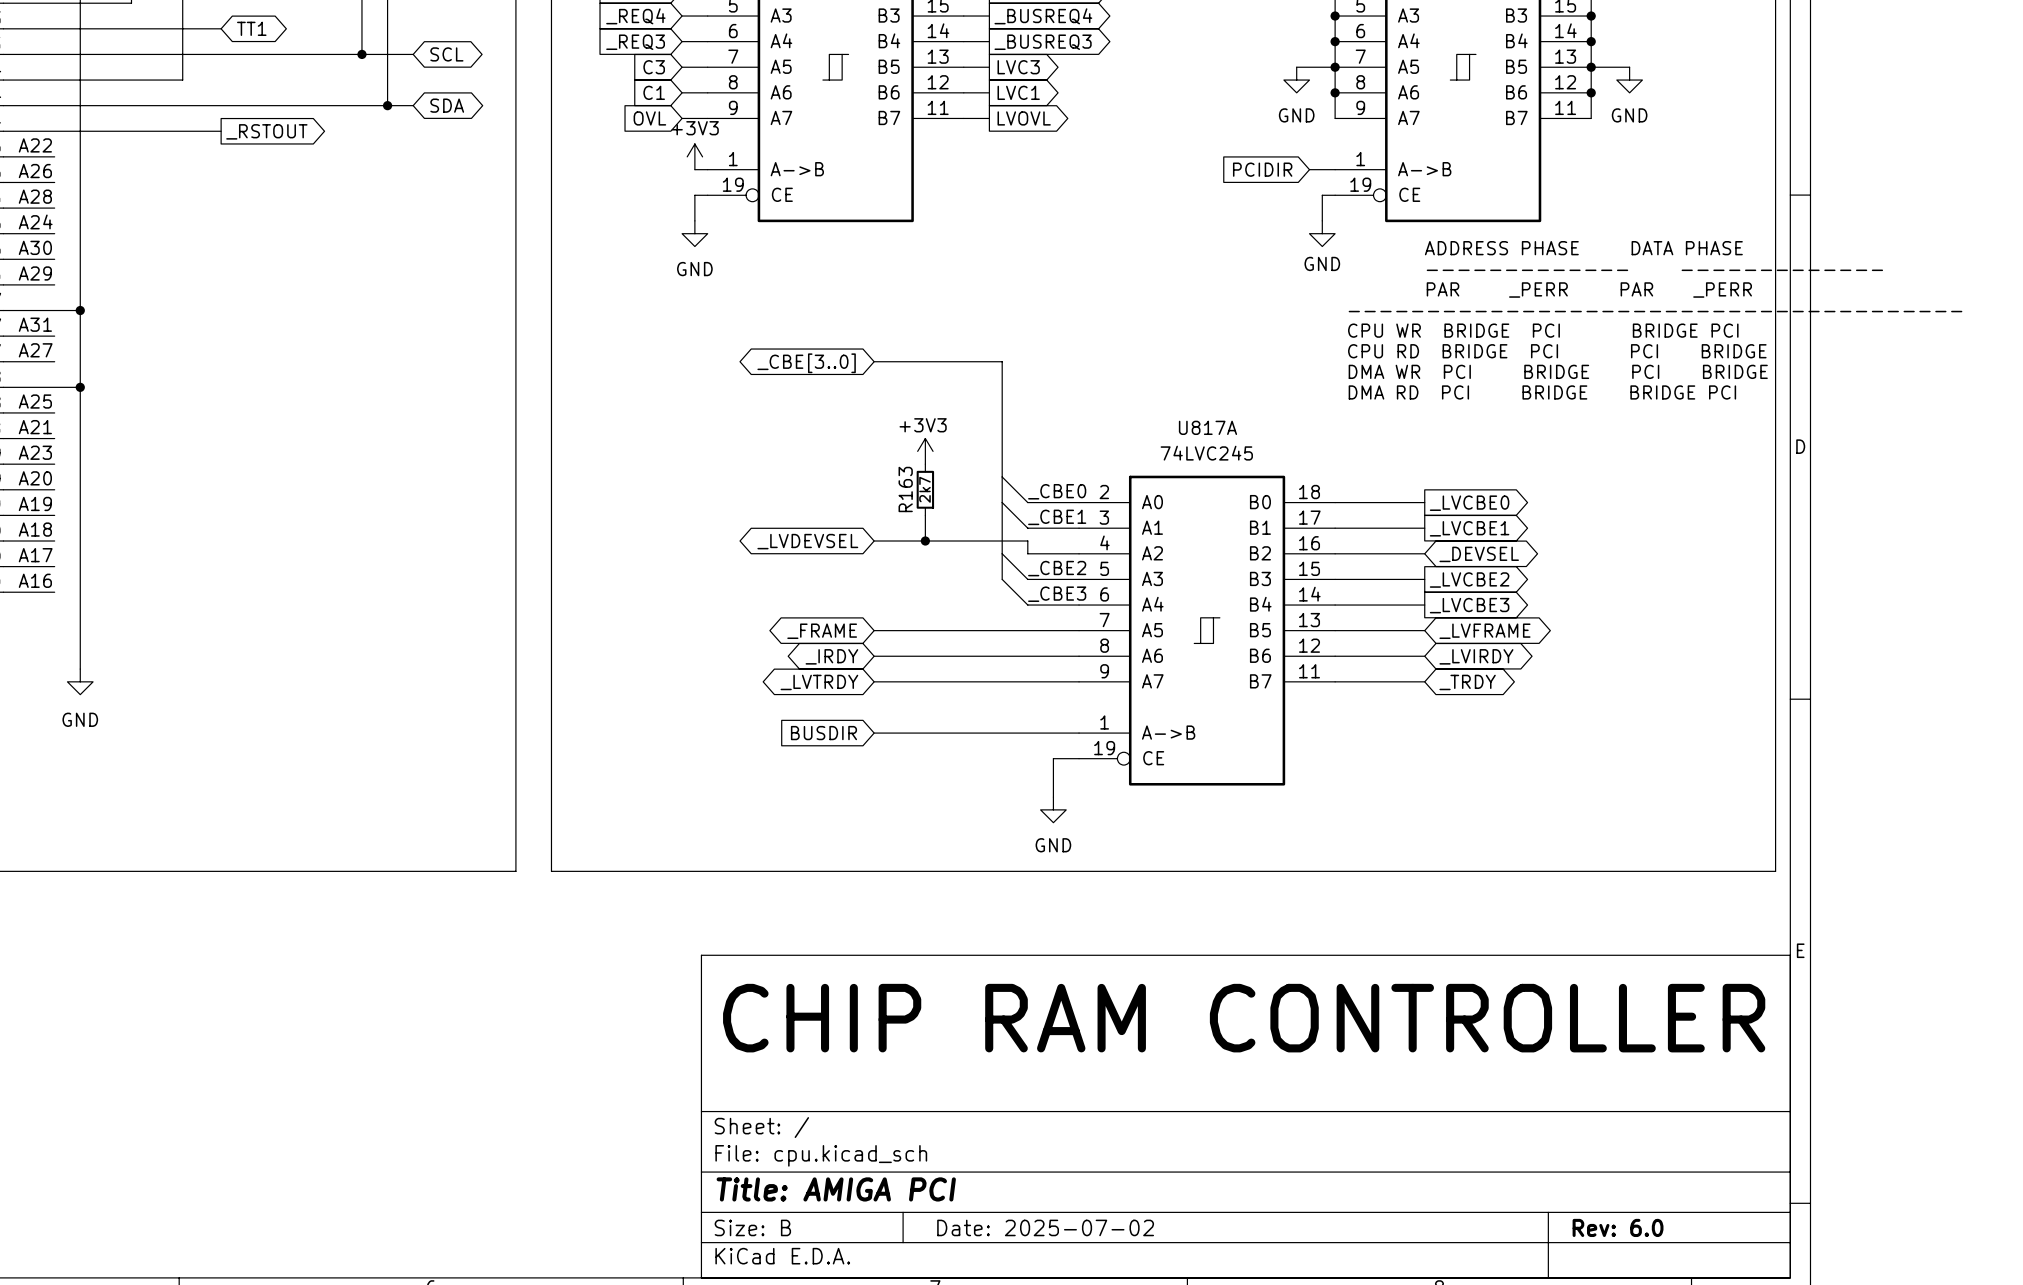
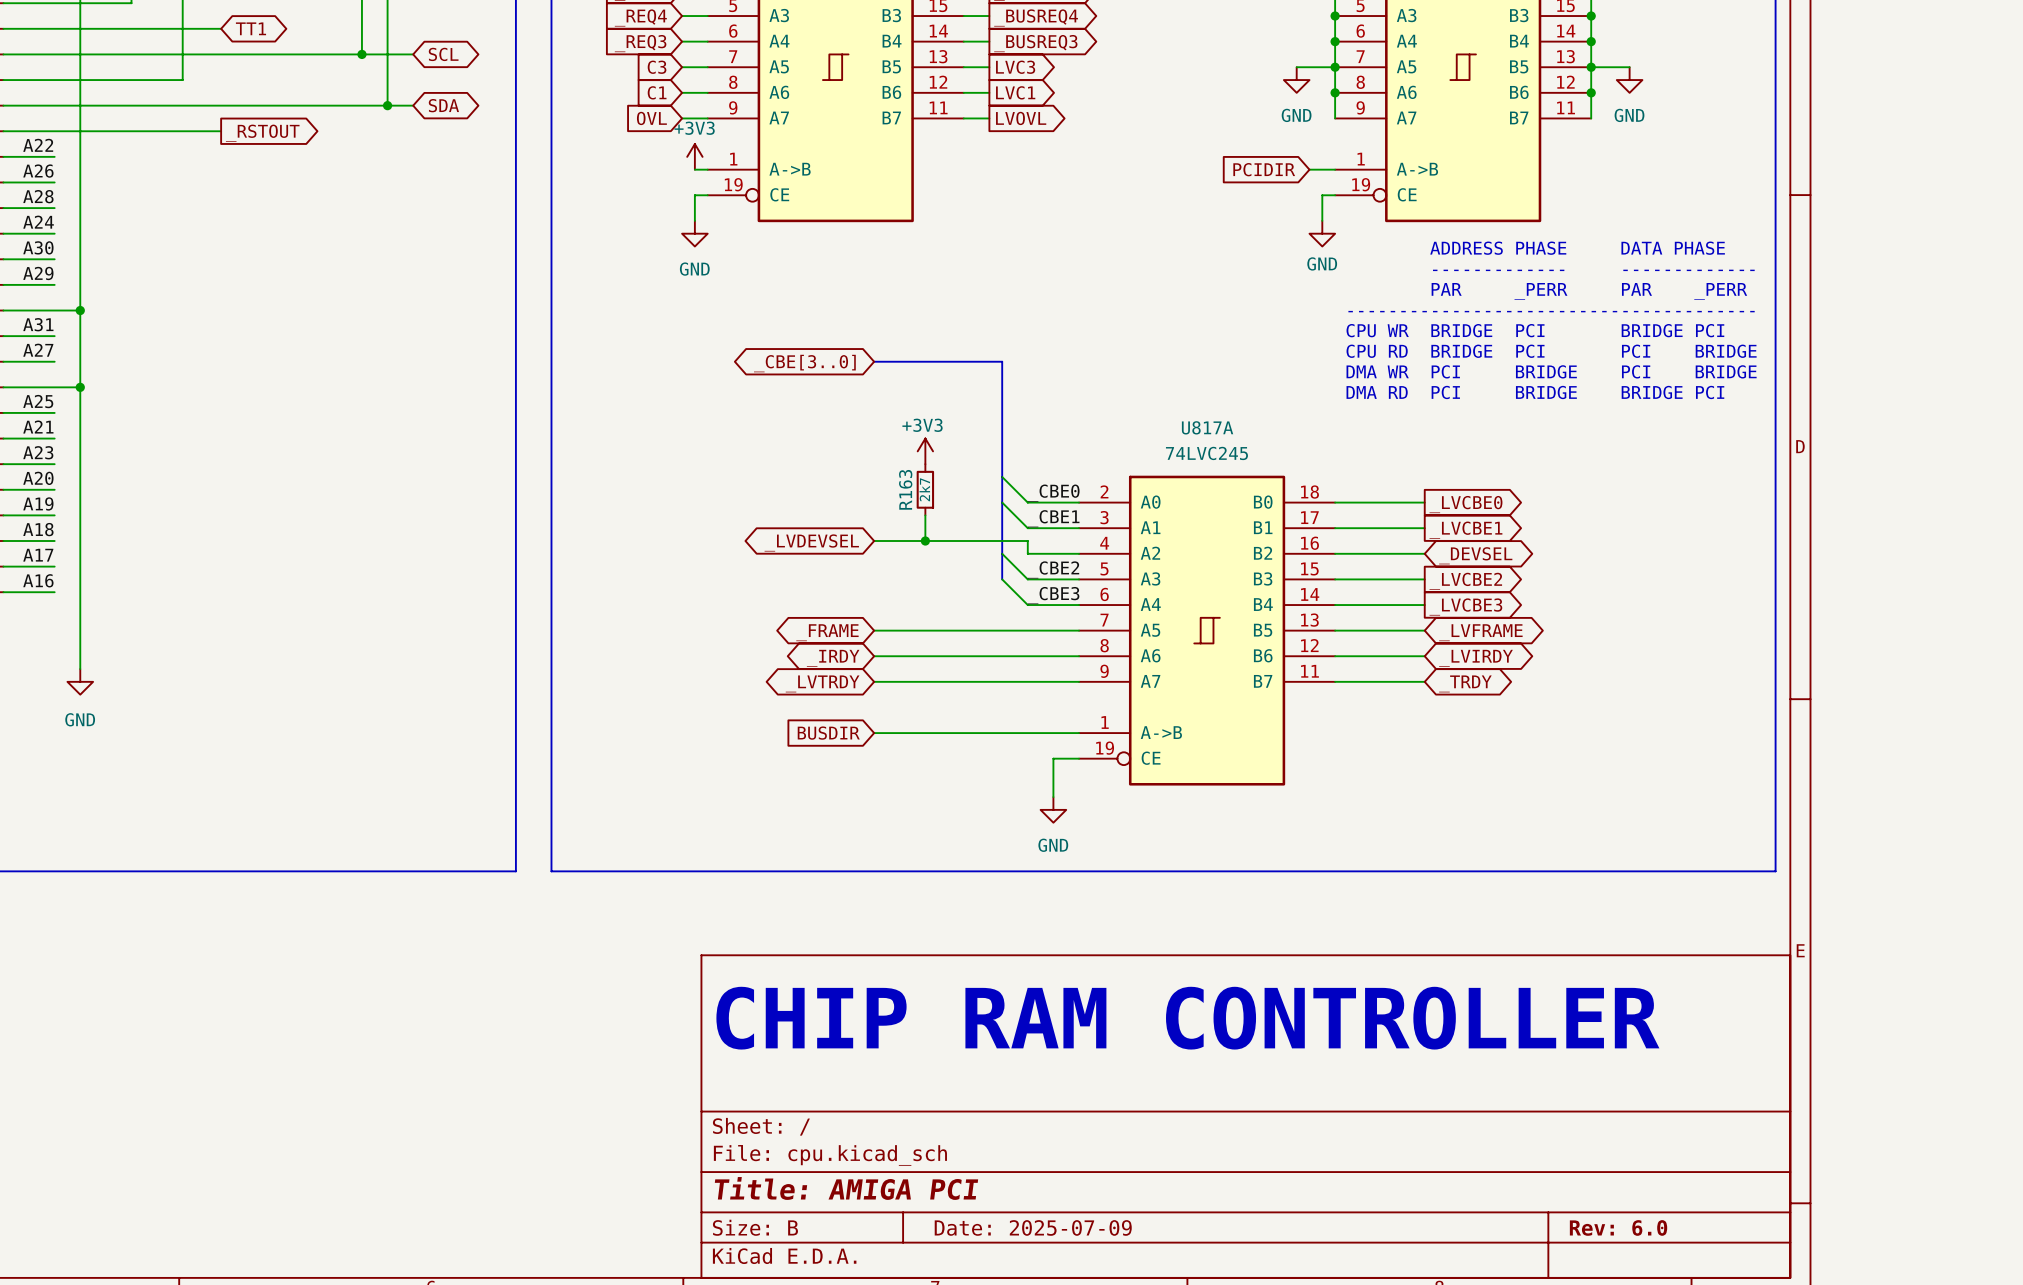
title block: Date: 2025-07-02 (1045, 1227) -> Date: 2025-07-09 (1033, 1227)

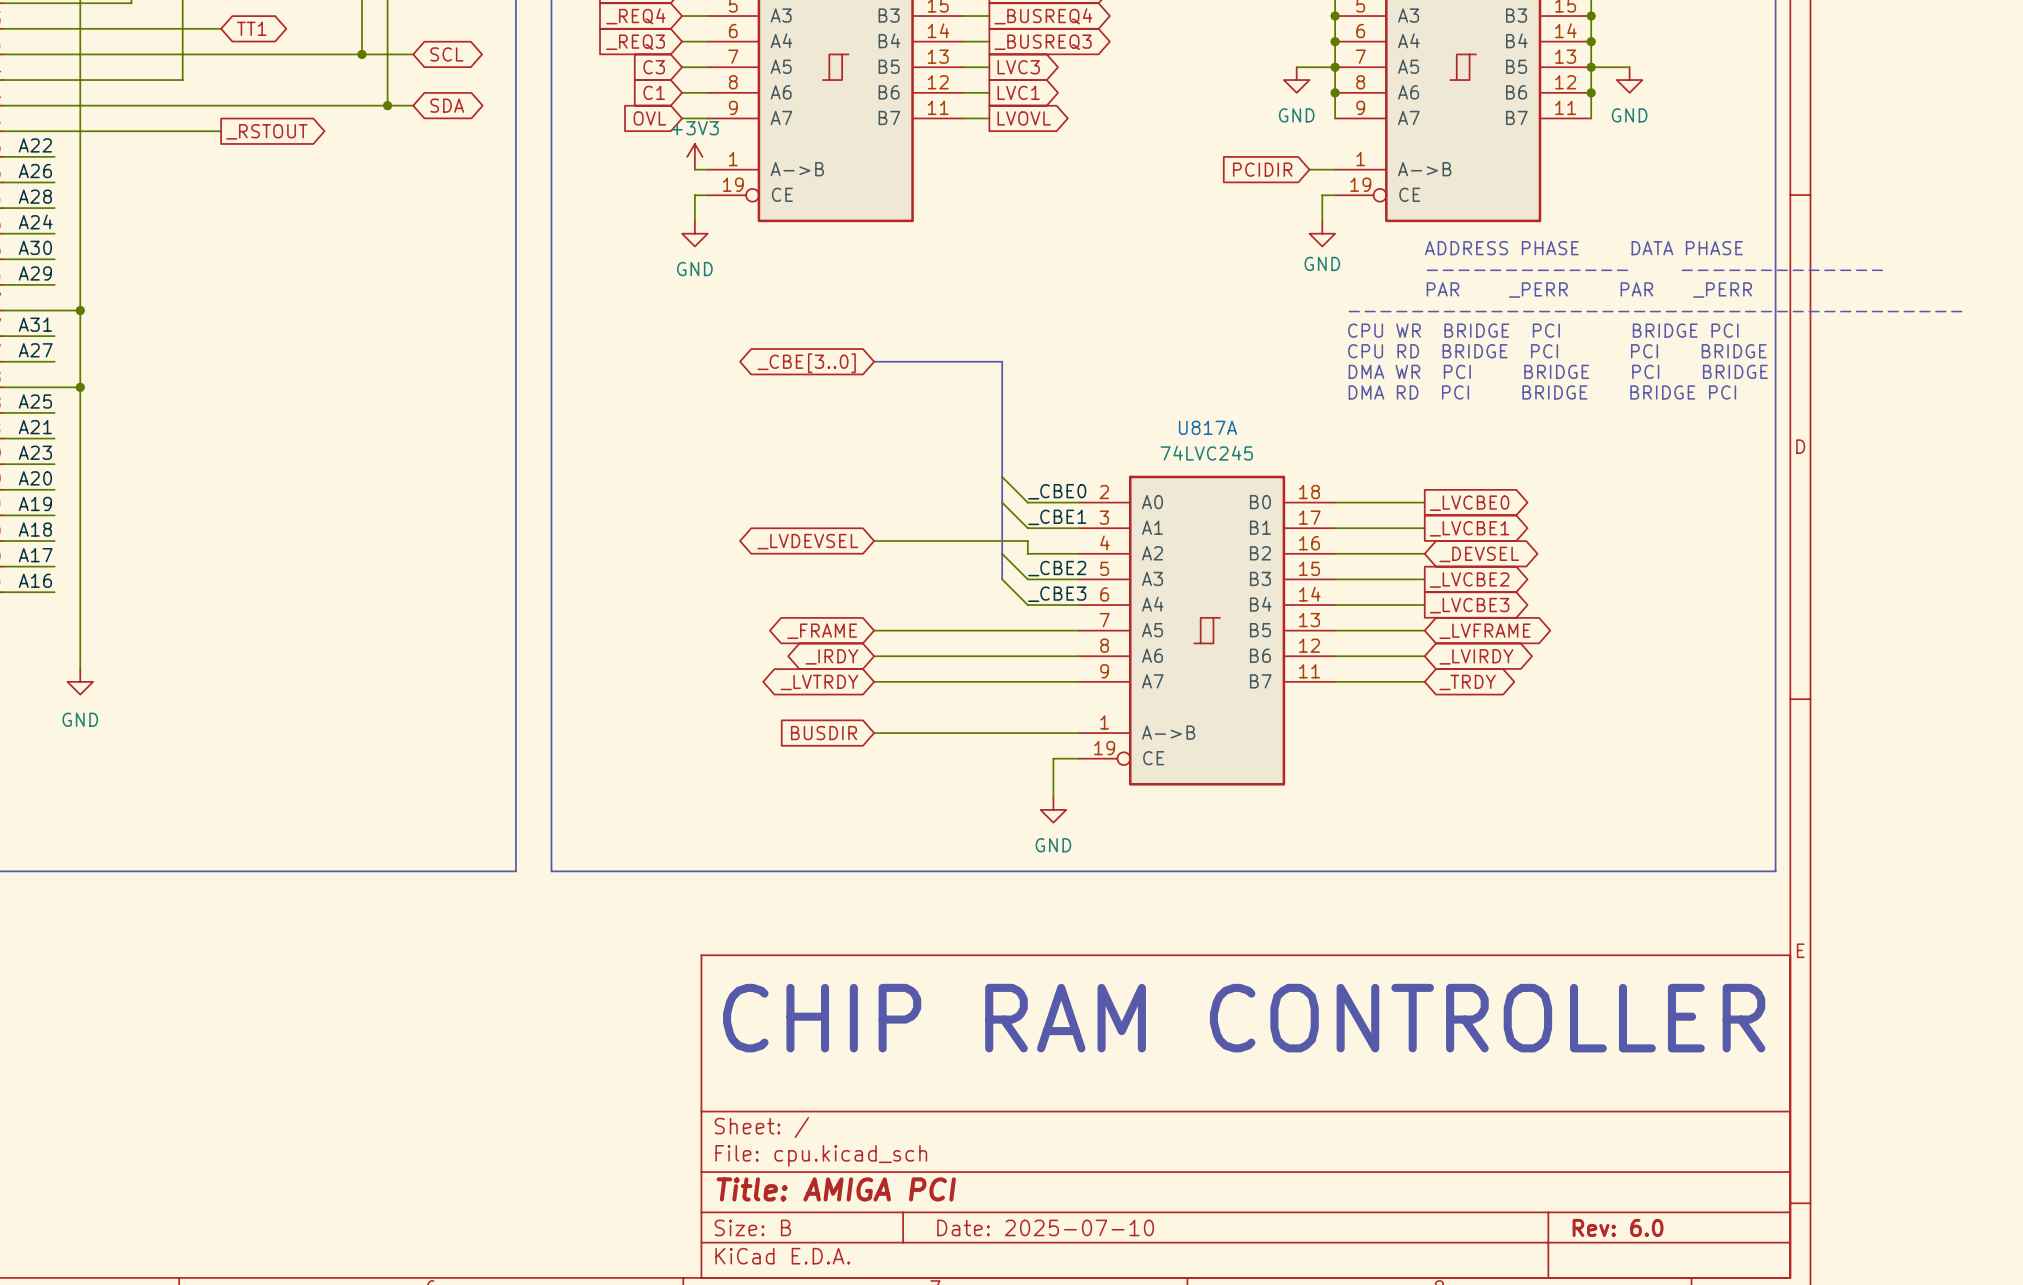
power symbol: +3V3 (925, 451) -> none
R163: 2k7 (925, 489) -> none
wire: (925, 515) (925, 541) -> none
junction: (925, 541) -> none
title block: Date: 2025-07-09 (1033, 1227) -> Date: 2025-07-10 (1045, 1227)

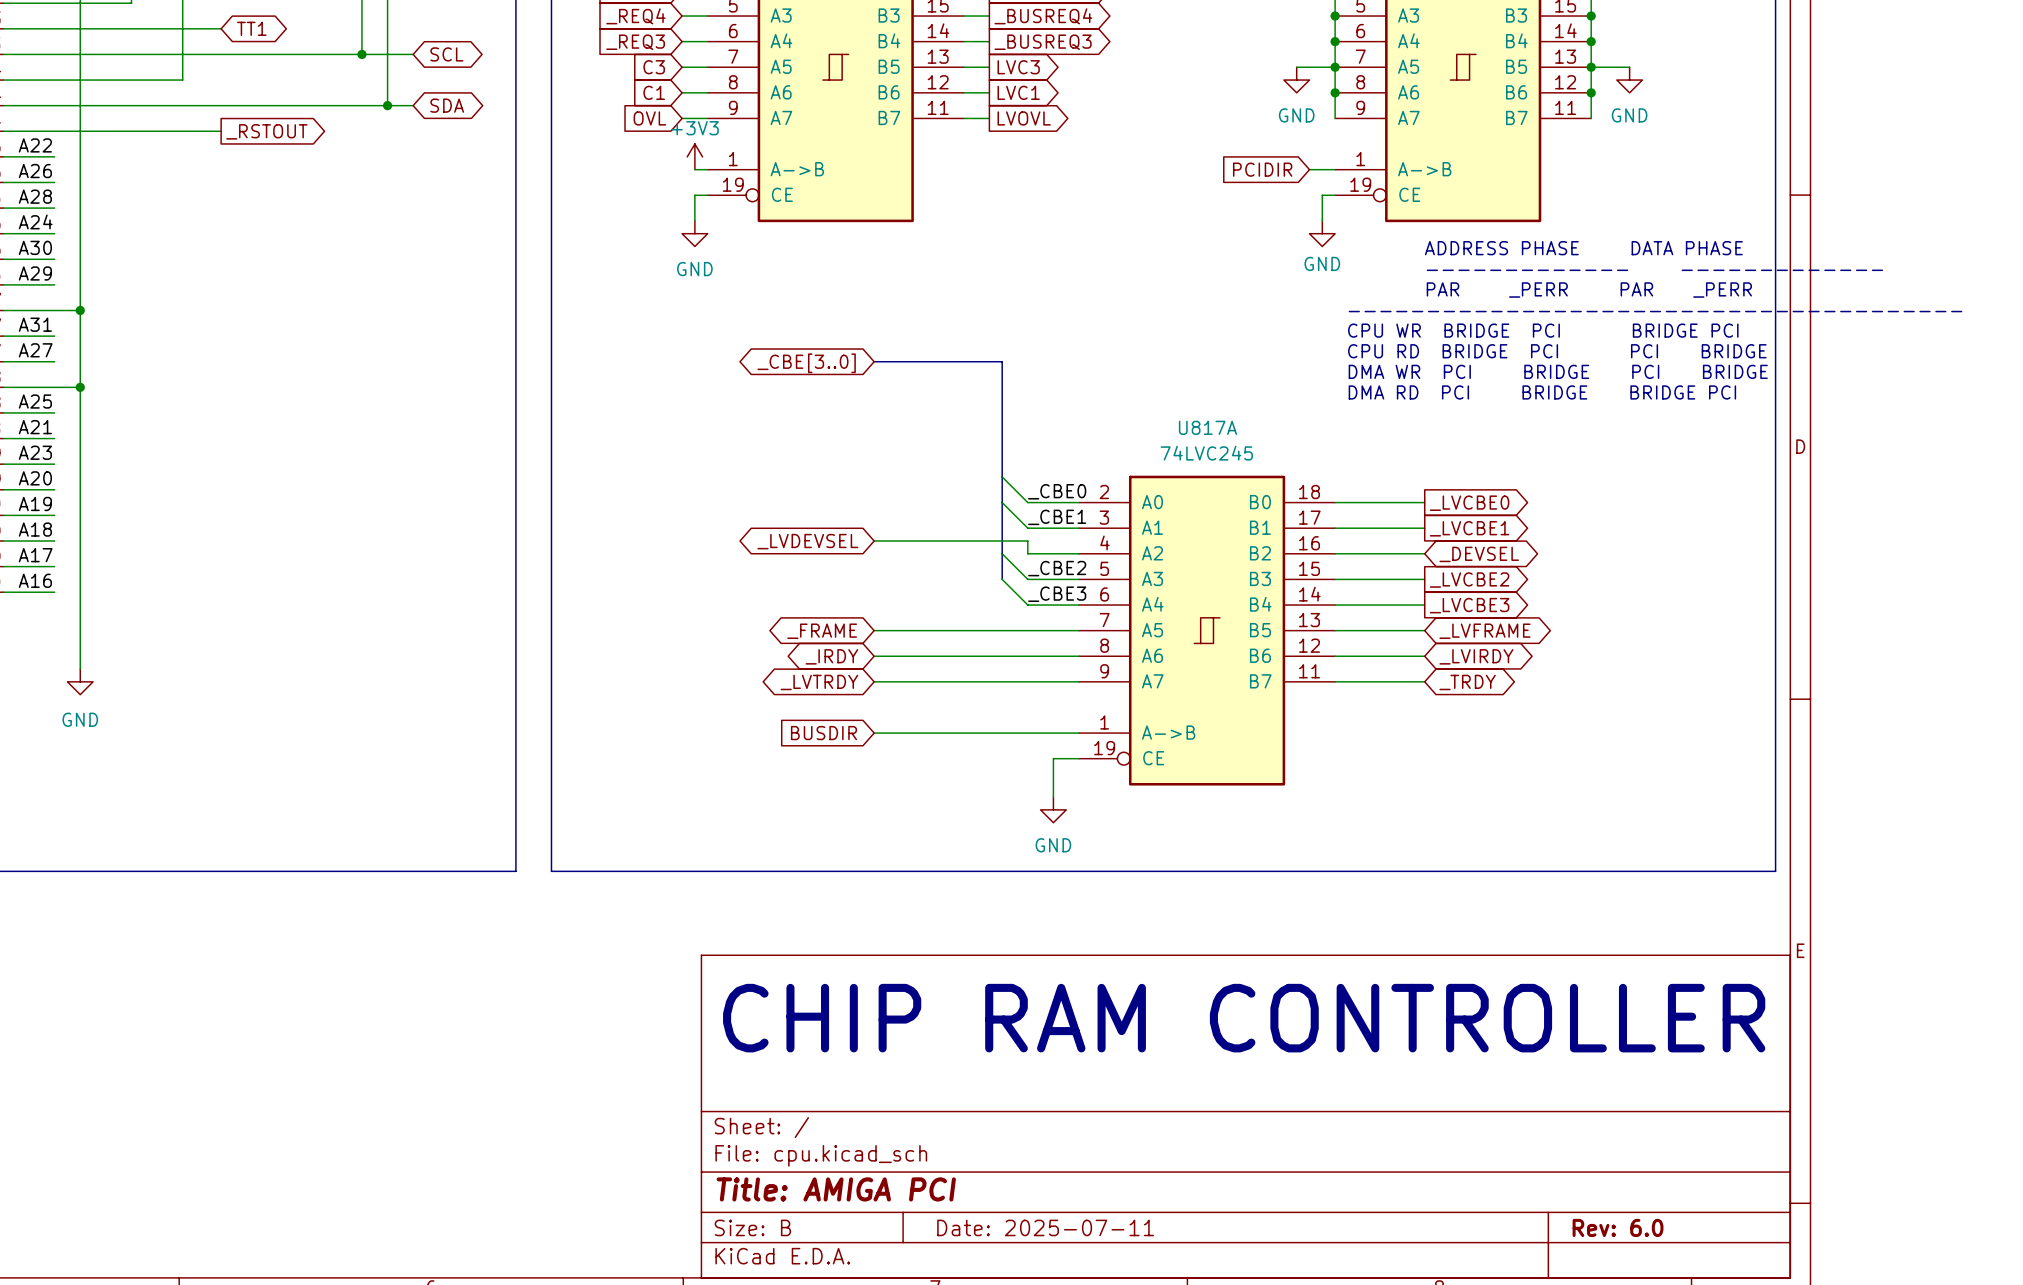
title block: Date: 2025-07-10 (1045, 1227) -> Date: 2025-07-11 (1045, 1227)

